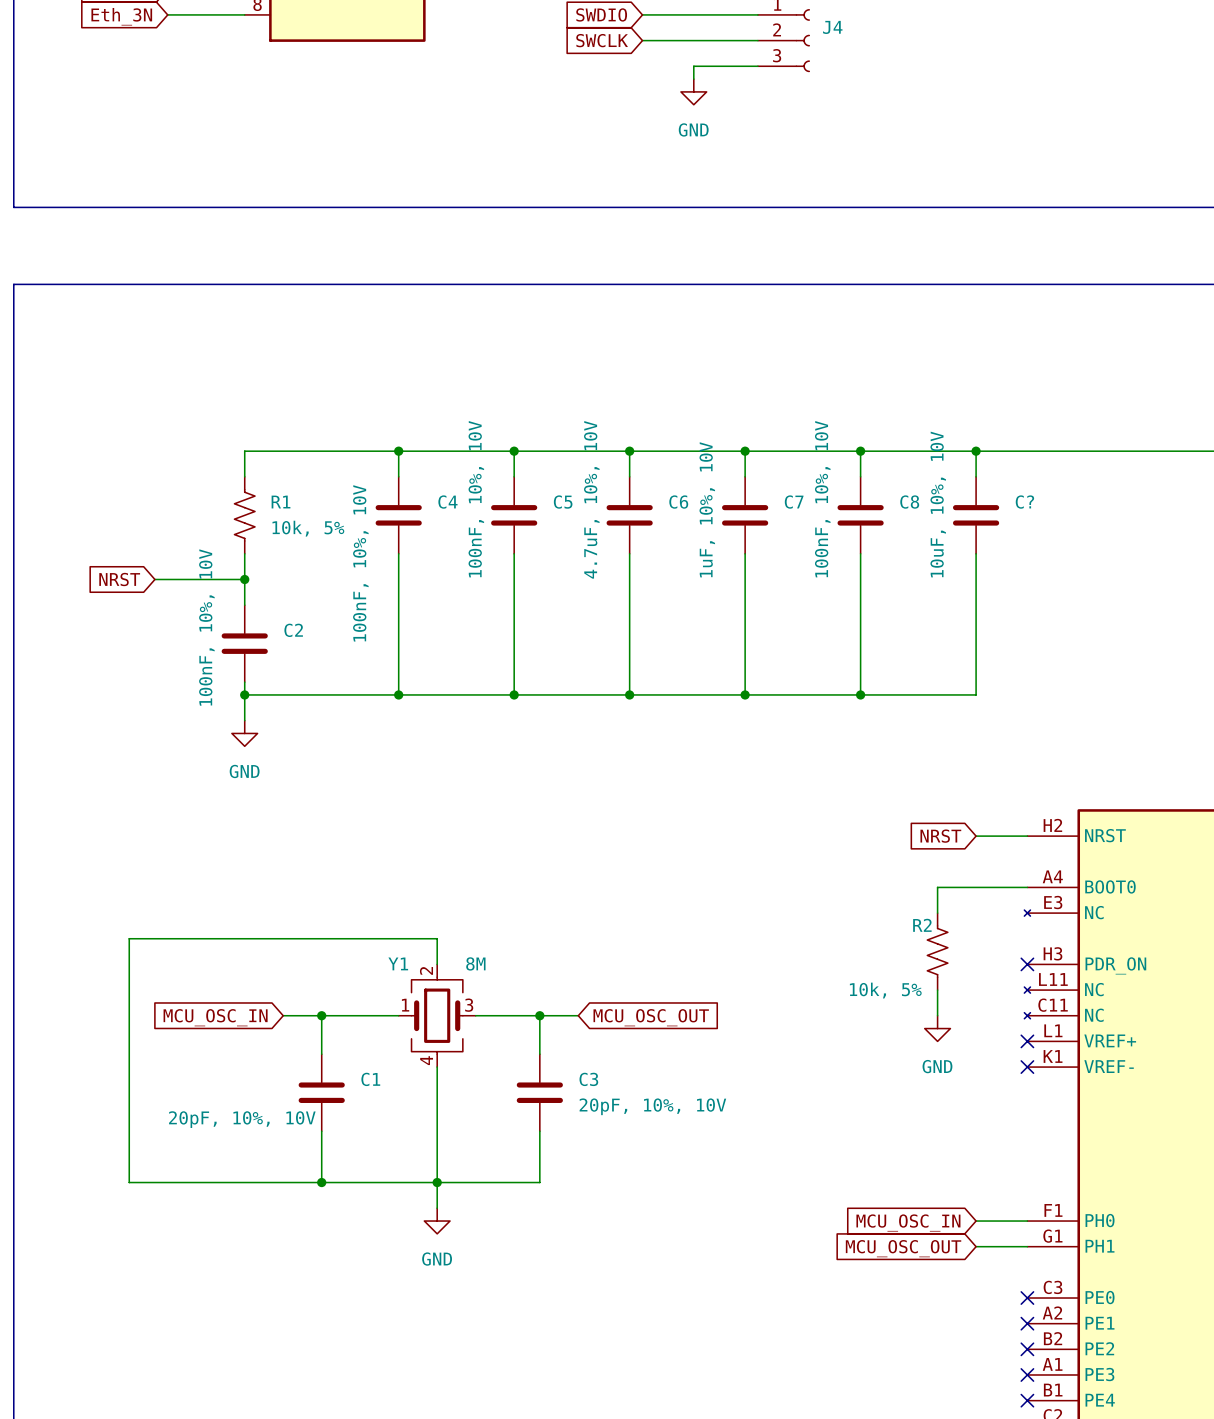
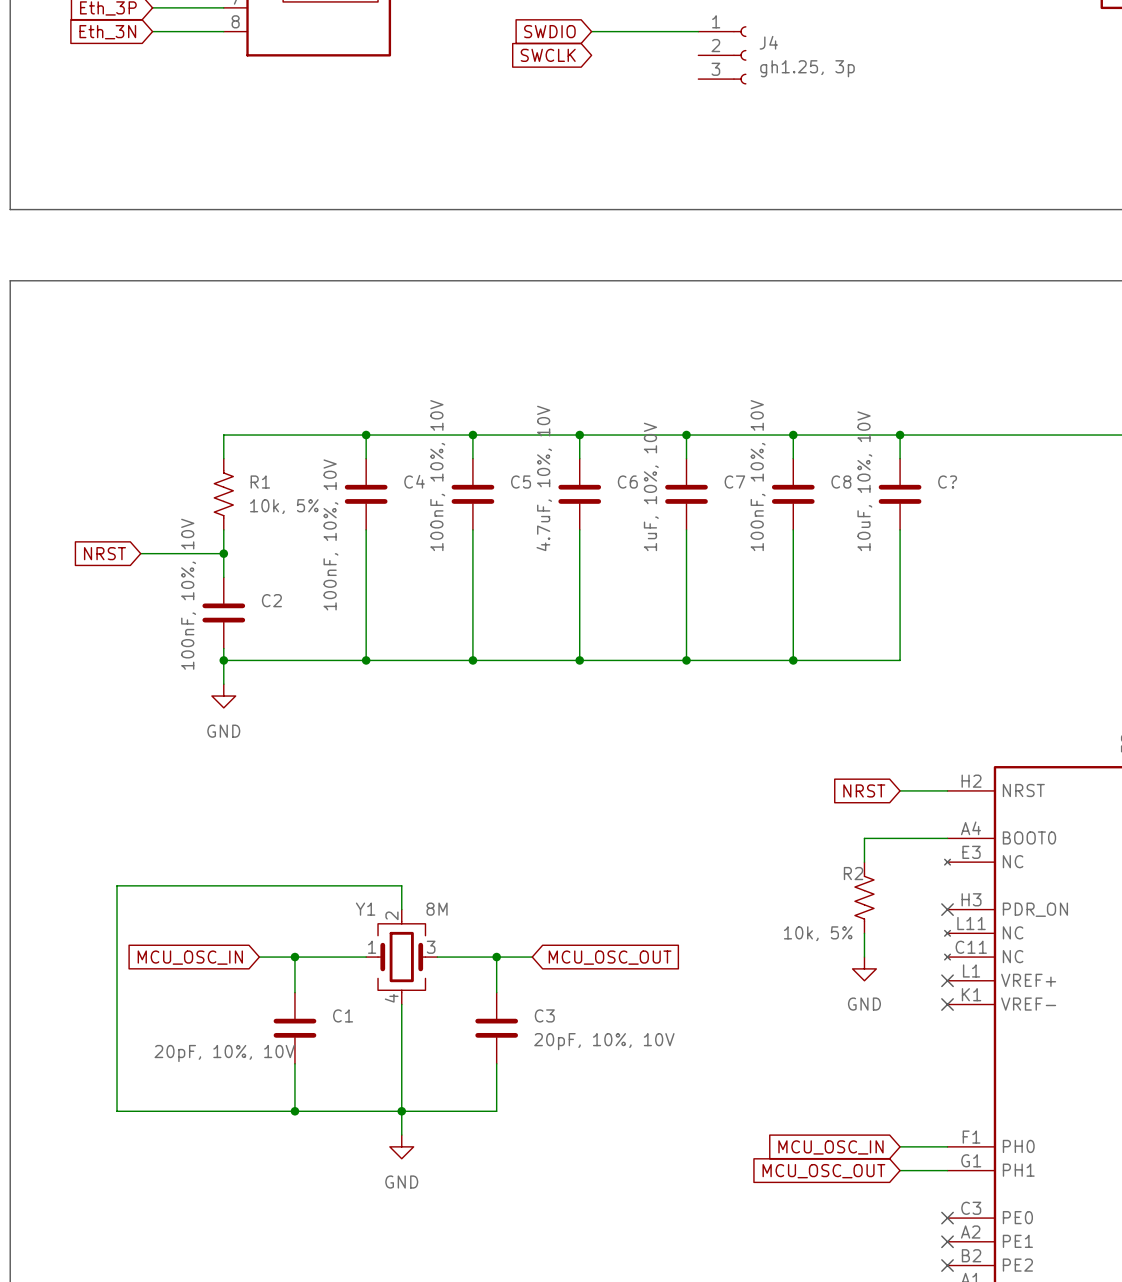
wire: (642, 40) (757, 40) -> none
J4 value: none -> gh1.25, 3p (807, 68)
wire: (757, 66) (693, 66) (693, 79) -> none
power symbol: GND (693, 91) -> none

